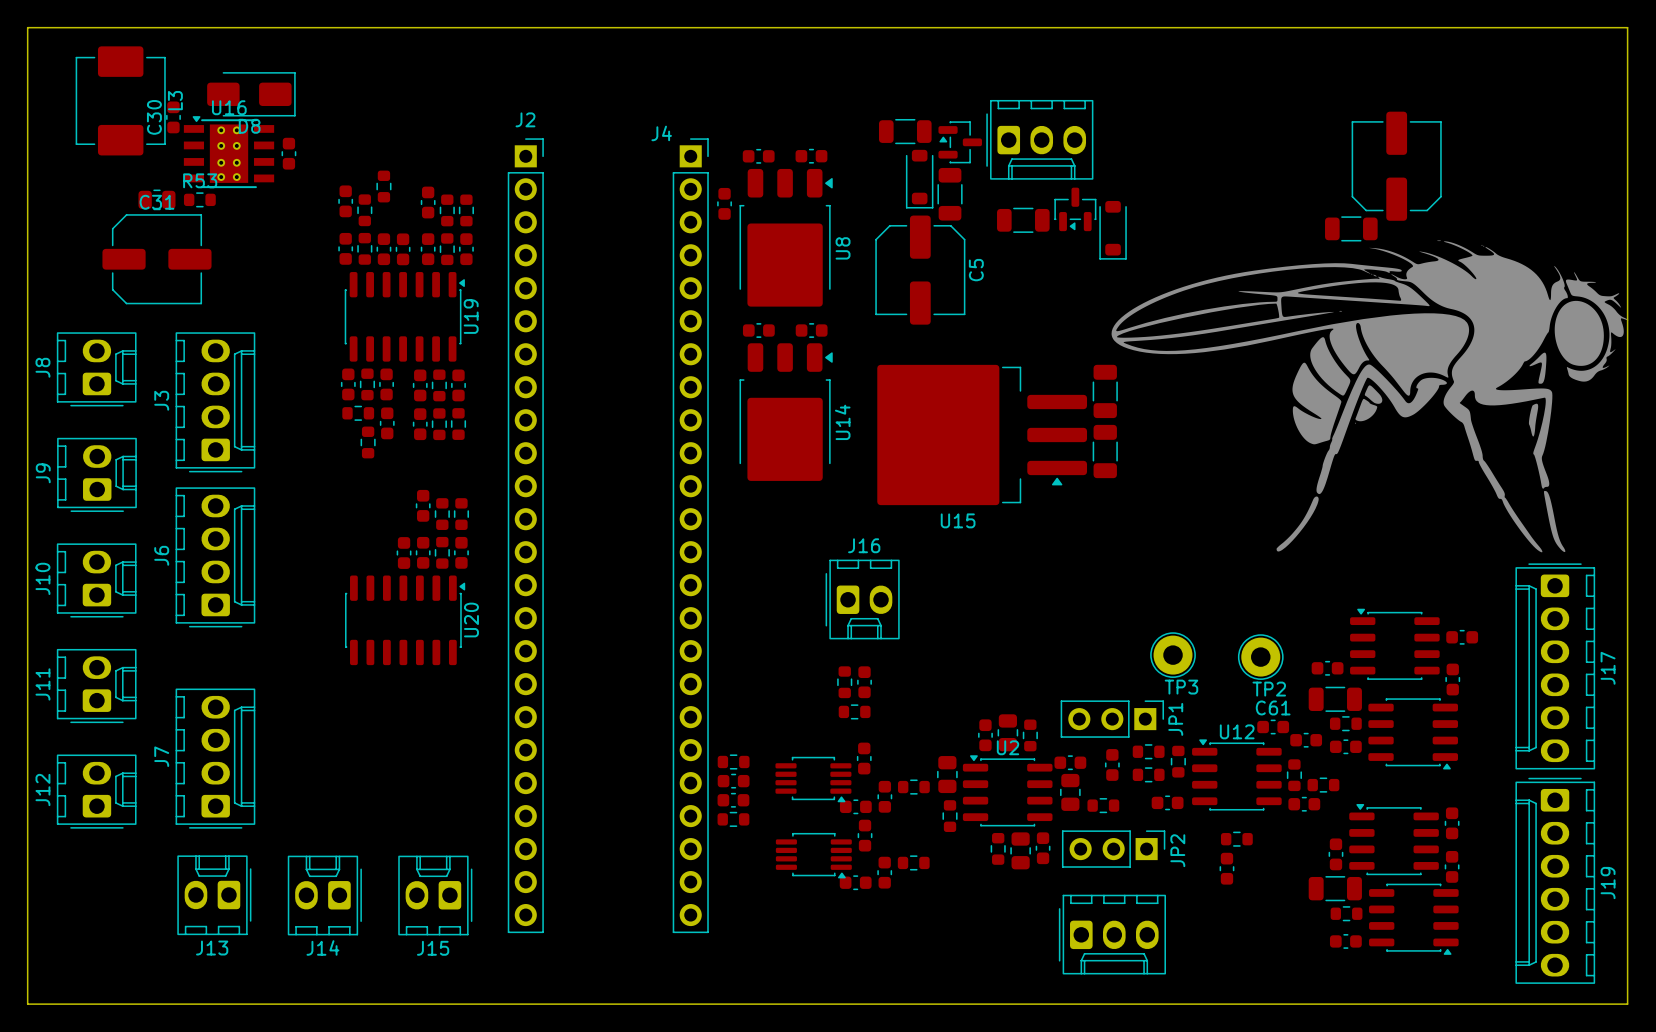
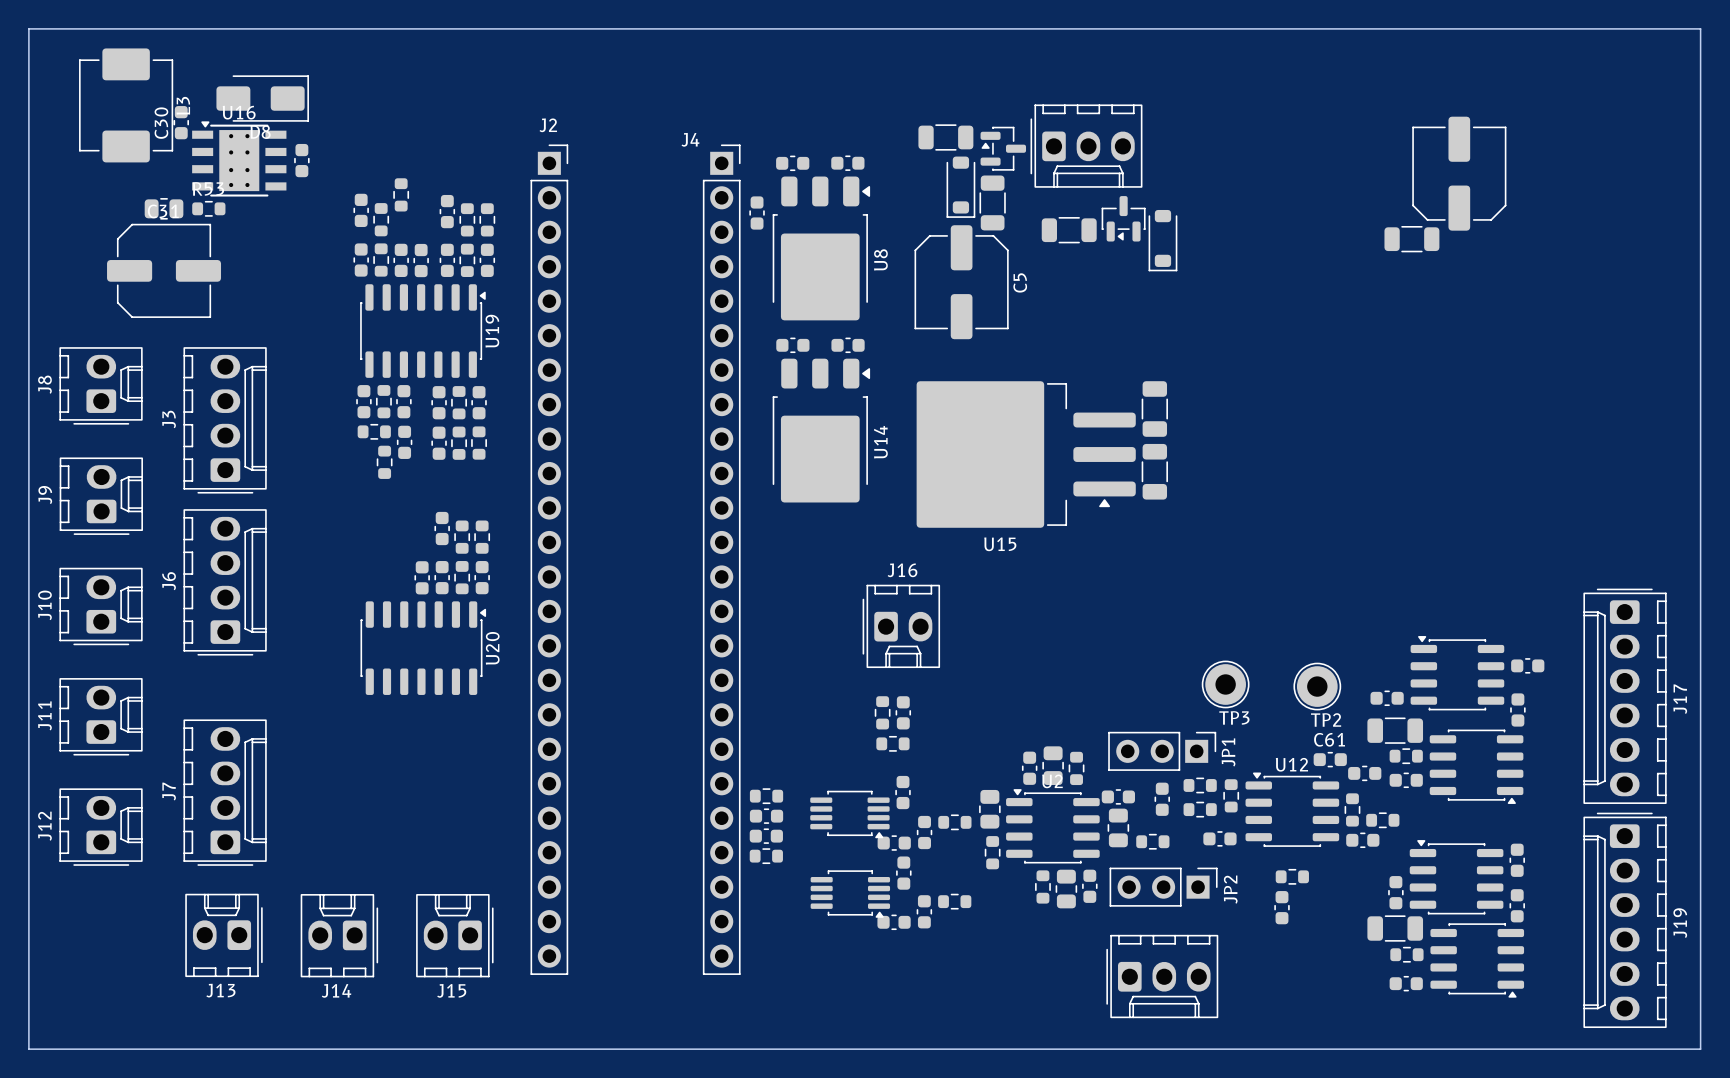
drawing: [1111, 240, 1629, 553] -> none

